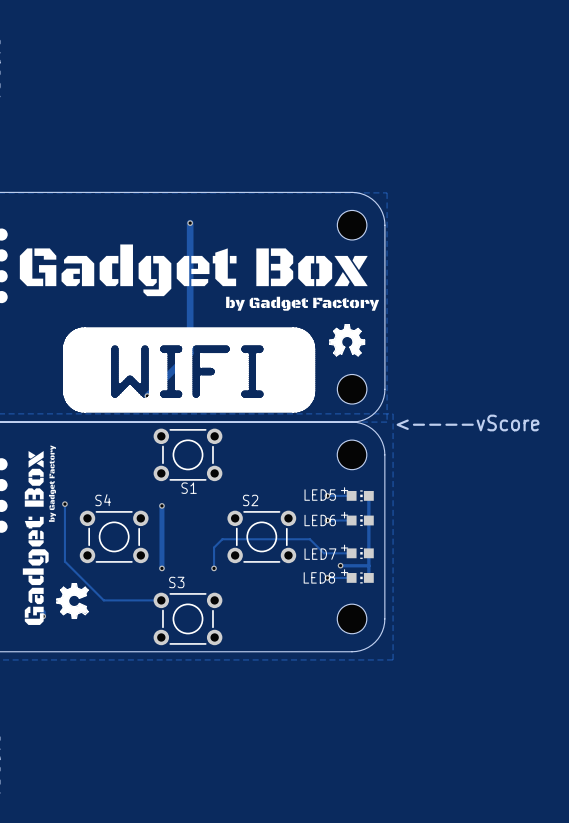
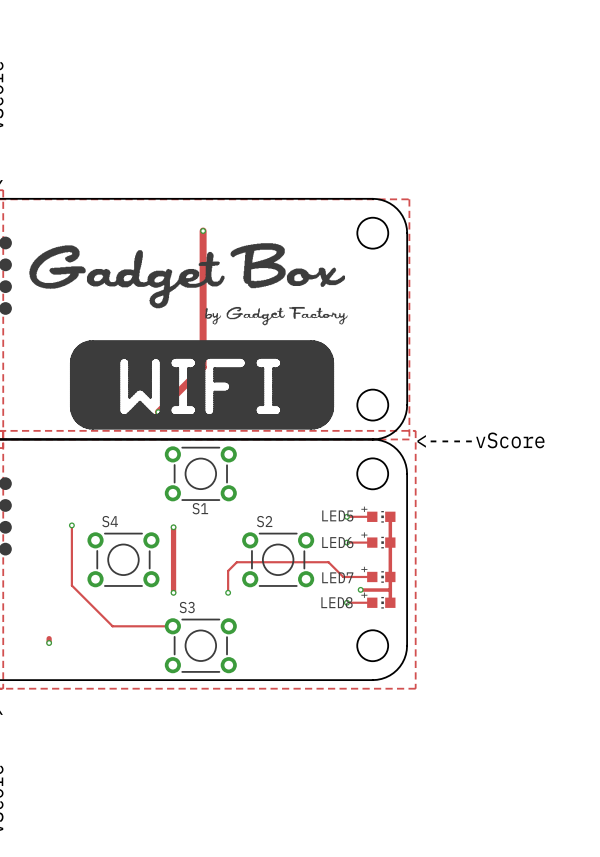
drawing: none -> [29, 243, 348, 326]
drawing: [19, 244, 380, 311] -> none
drawing: [329, 324, 366, 357] -> none
drawing: [22, 445, 89, 625] -> none

